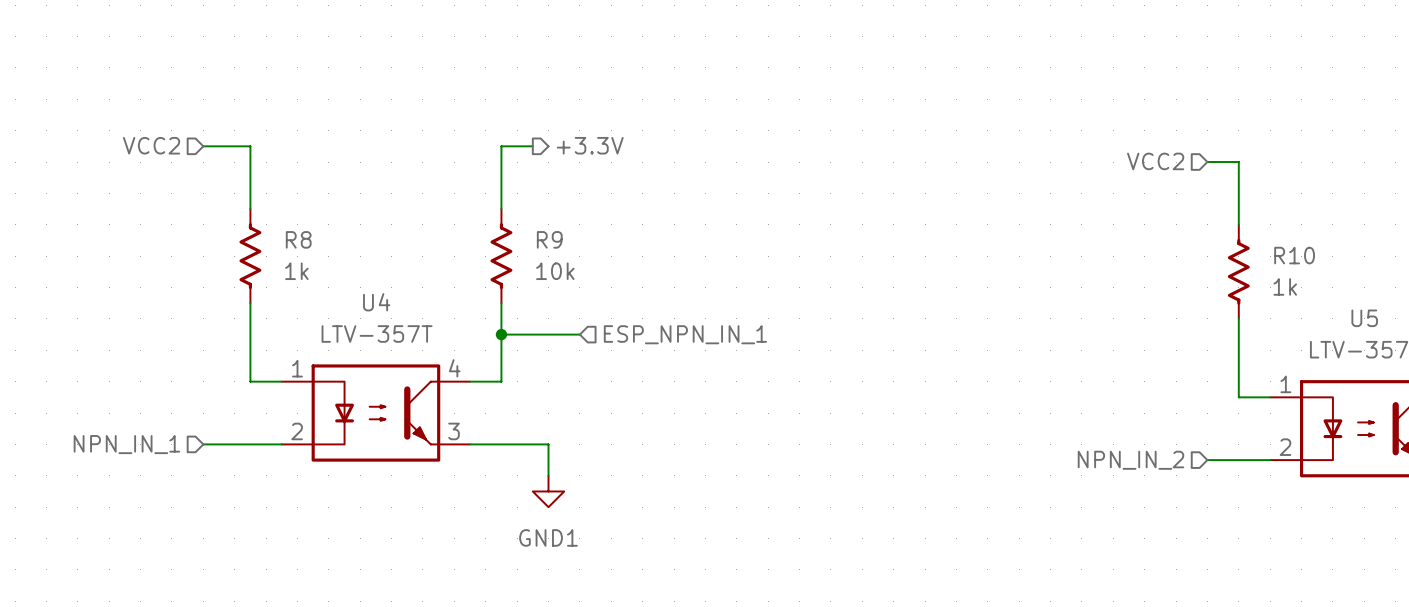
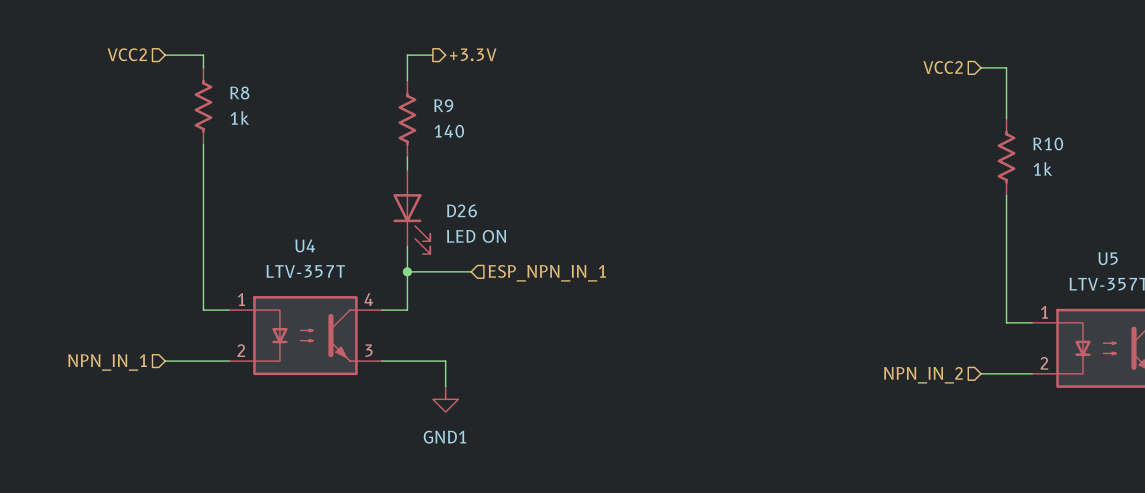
wire: none -> (165, 55) (203, 55) (203, 67)
wire: none -> (432, 55) (407, 55) (407, 80)
hierarchical label position: VCC2 (151, 145) -> VCC2 (127, 54)
hierarchical label position: +3.3V (590, 145) -> +3.3V (473, 54)
wire: (203, 146) (250, 146) (250, 177) -> none
wire: (532, 146) (501, 146) (501, 193) -> none
hierarchical label position: VCC2 (1155, 161) -> VCC2 (943, 67)
wire: (1207, 162) (1238, 162) (1238, 224) -> (981, 67) (1006, 67) (1006, 118)
R8 position: (250, 256) -> (203, 106)
R9 position: (501, 256) -> (407, 118)
D26: none -> LED ON (411, 211)
R9 value: 10k (555, 271) -> 140 (449, 131)
R10 position: (1238, 271) -> (1006, 157)

